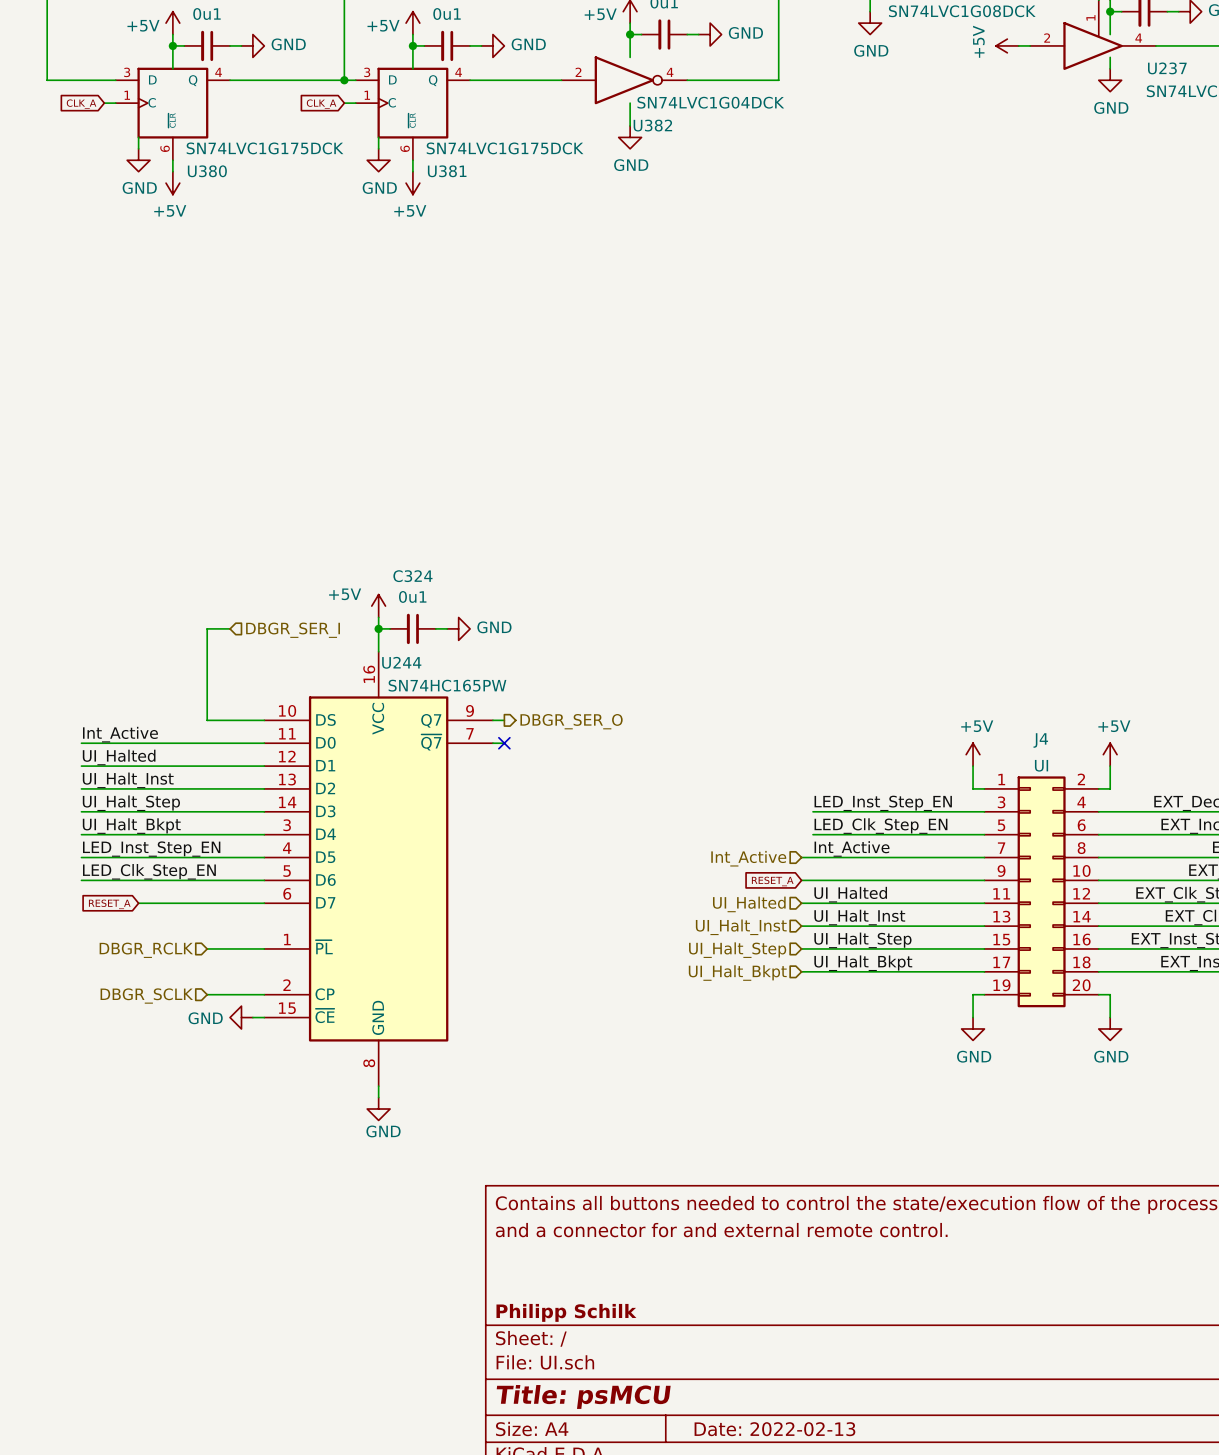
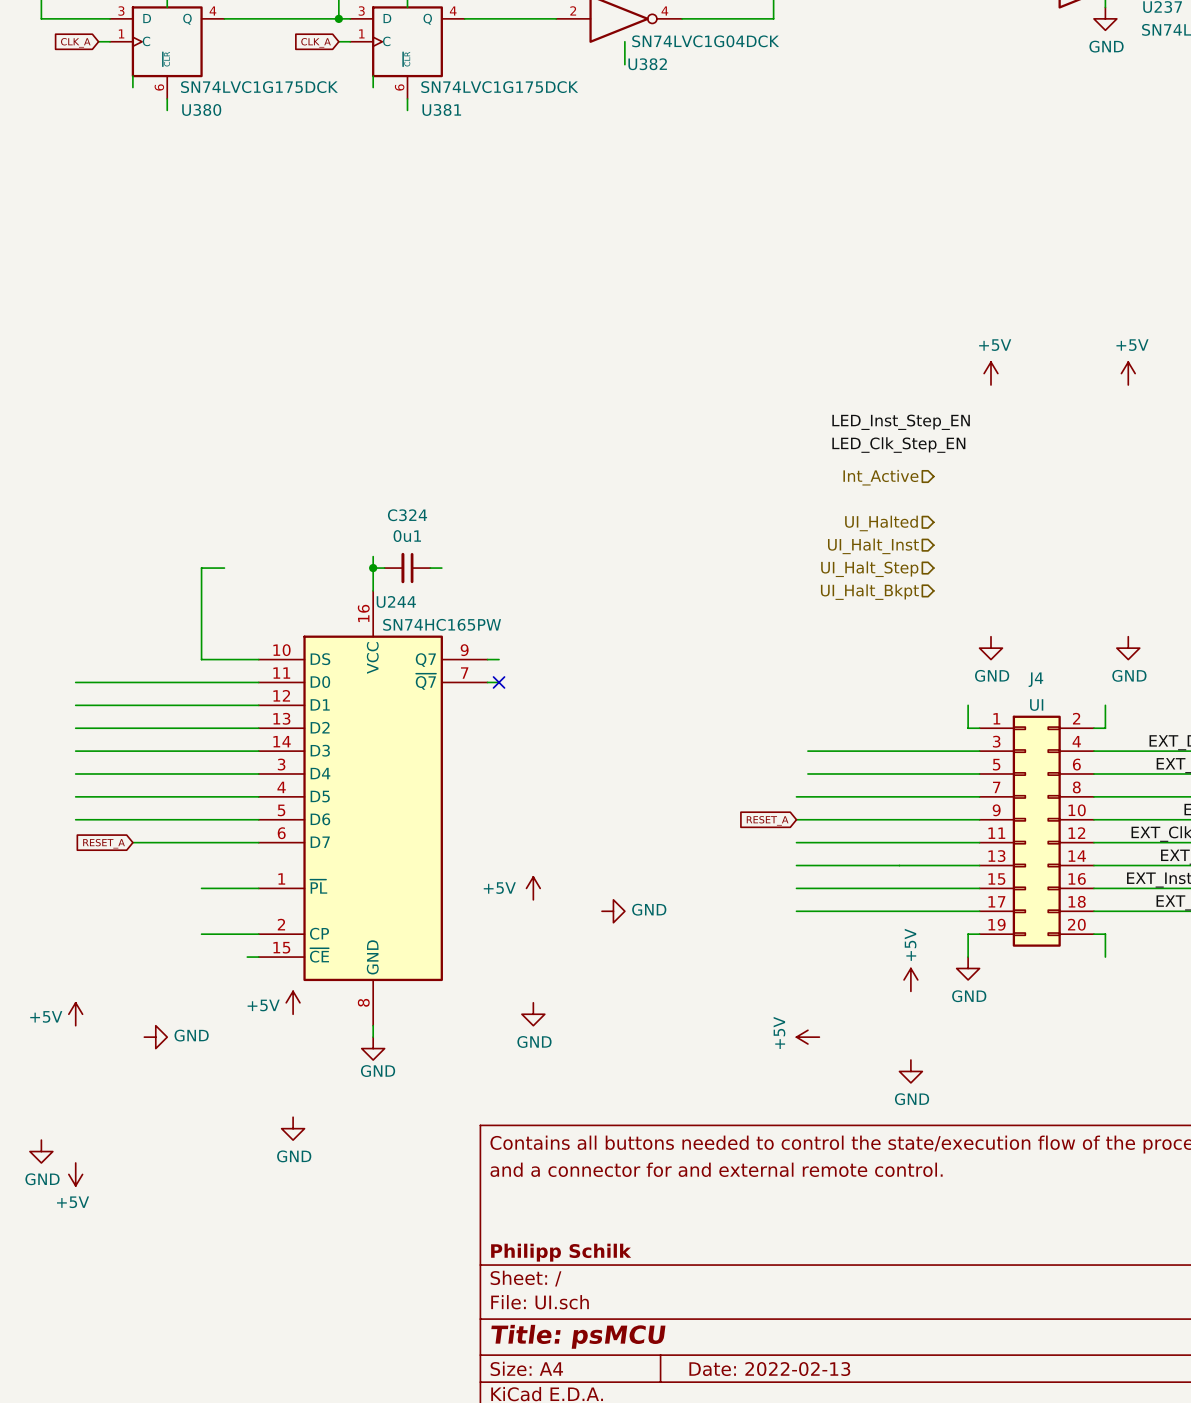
power symbol: GND (630, 137) -> none
power symbol: GND (138, 160) -> none
power symbol: GND (378, 160) -> none
power symbol: +5V (172, 183) -> none
power symbol: +5V (412, 183) -> none
power symbol: none -> +5V (991, 373)
power symbol: none -> +5V (1128, 373)
label: none -> LED_Inst_Step_EN (901, 422)
label: none -> LED_Clk_Step_EN (898, 445)
hierarchical label: none -> Int_Active (880, 477)
hierarchical label: none -> UI_Halted (881, 523)
power symbol: +5V (378, 606) -> none
hierarchical label: none -> UI_Halt_Inst (873, 546)
power symbol: GND (458, 628) -> none
hierarchical label: DBGR_SER_I (293, 630) -> none
hierarchical label: none -> UI_Halt_Step (869, 569)
hierarchical label: none -> UI_Halt_Bkpt (869, 592)
power symbol: none -> GND (991, 648)
power symbol: none -> GND (1128, 648)
hierarchical label: DBGR_SER_O (571, 721) -> none
label: Int_Active (120, 734) -> none
power symbol: +5V (973, 754) -> none
power symbol: +5V (1110, 754) -> none
label: UI_Halted (119, 757) -> none
label: UI_Halt_Inst (128, 780) -> none
label: UI_Halt_Step (131, 803) -> none
label: LED_Inst_Step_EN (883, 803) -> none
label: UI_Halt_Bkpt (131, 826) -> none
label: LED_Clk_Step_EN (880, 826) -> none
label: Int_Active (852, 848) -> none
label: LED_Inst_Step_EN (151, 849) -> none
hierarchical label: Int_Active (748, 858) -> none
label: LED_Clk_Step_EN (149, 871) -> none
label: UI_Halted (850, 894) -> none
hierarchical label: UI_Halted (749, 904) -> none
label: UI_Halt_Inst (859, 917) -> none
hierarchical label: UI_Halt_Inst (741, 927) -> none
label: UI_Halt_Step (862, 940) -> none
power symbol: none -> +5V (533, 888)
hierarchical label: DBGR_RCLK (146, 950) -> none
hierarchical label: UI_Halt_Step (737, 950) -> none
label: UI_Halt_Bkpt (863, 963) -> none
power symbol: none -> GND (613, 911)
hierarchical label: UI_Halt_Bkpt (737, 973) -> none
hierarchical label: DBGR_SCLK (146, 996) -> none
power symbol: GND (241, 1017) -> none
power symbol: GND (1110, 1028) -> none
power symbol: none -> +5V (910, 979)
power symbol: none -> +5V (293, 1002)
power symbol: none -> +5V (75, 1014)
power symbol: none -> GND (533, 1014)
power symbol: none -> GND (155, 1037)
power symbol: none -> +5V (807, 1037)
power symbol: none -> GND (910, 1071)
power symbol: none -> GND (293, 1128)
power symbol: none -> GND (41, 1151)
power symbol: none -> +5V (75, 1174)

